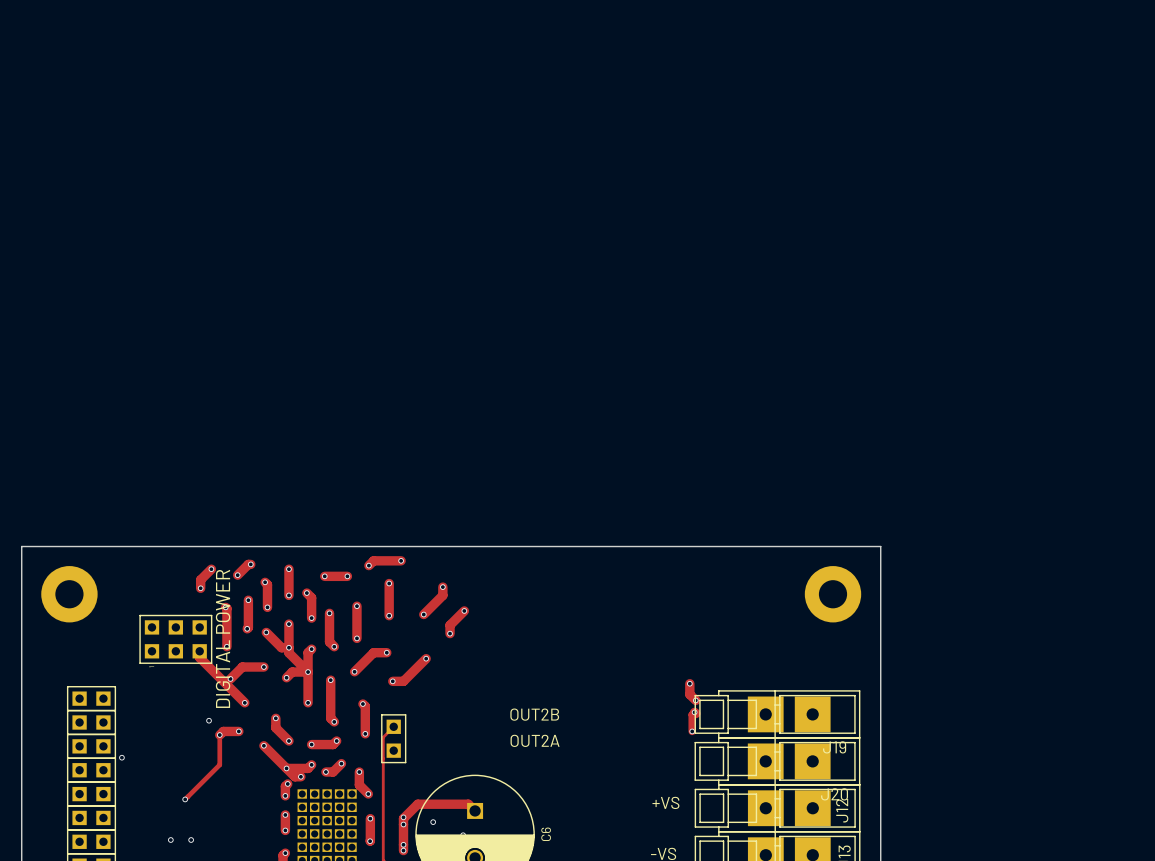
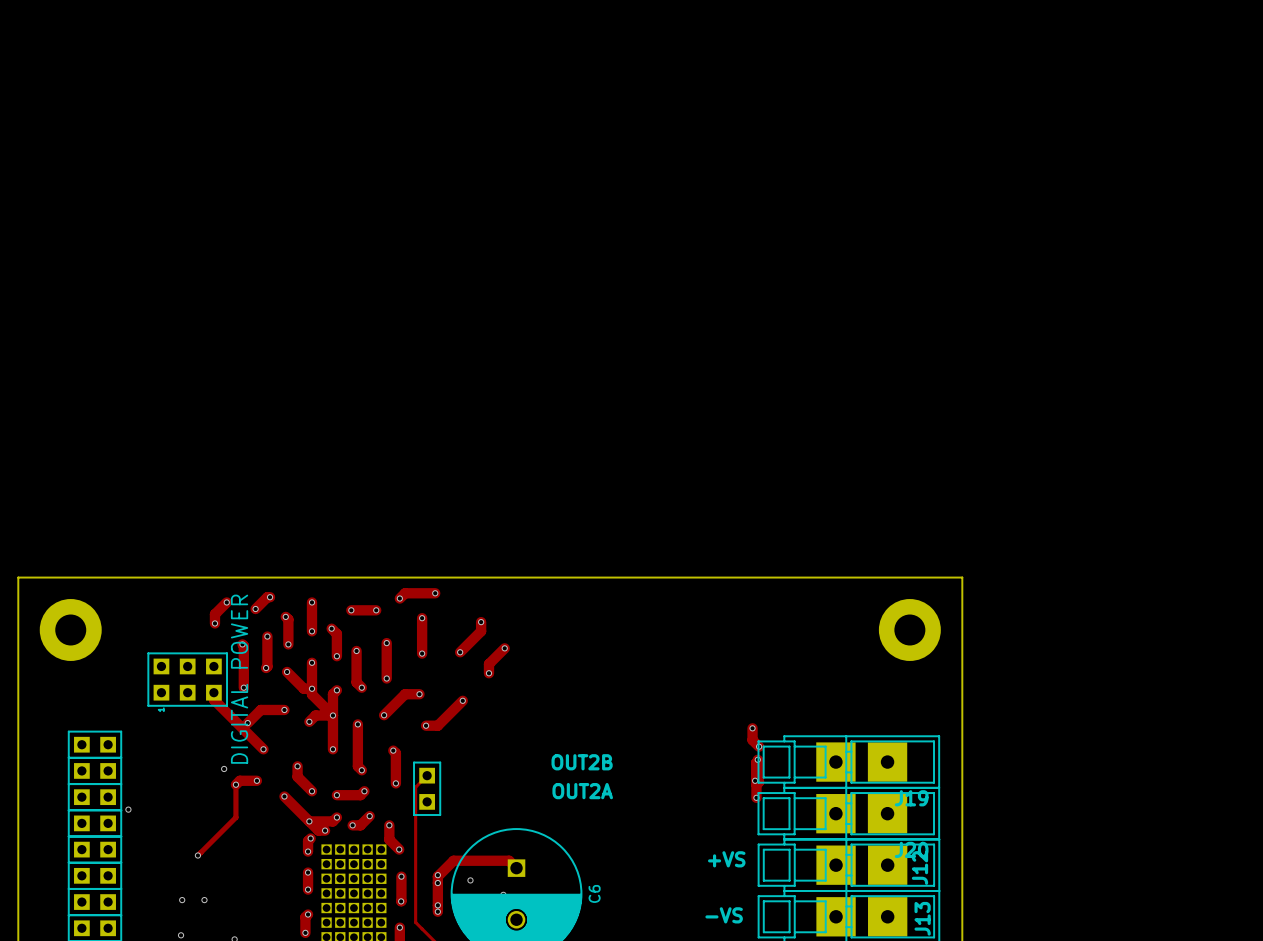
track: none -> (757, 765) (759, 782) (756, 784) (756, 797)
via: none -> (756, 797)

